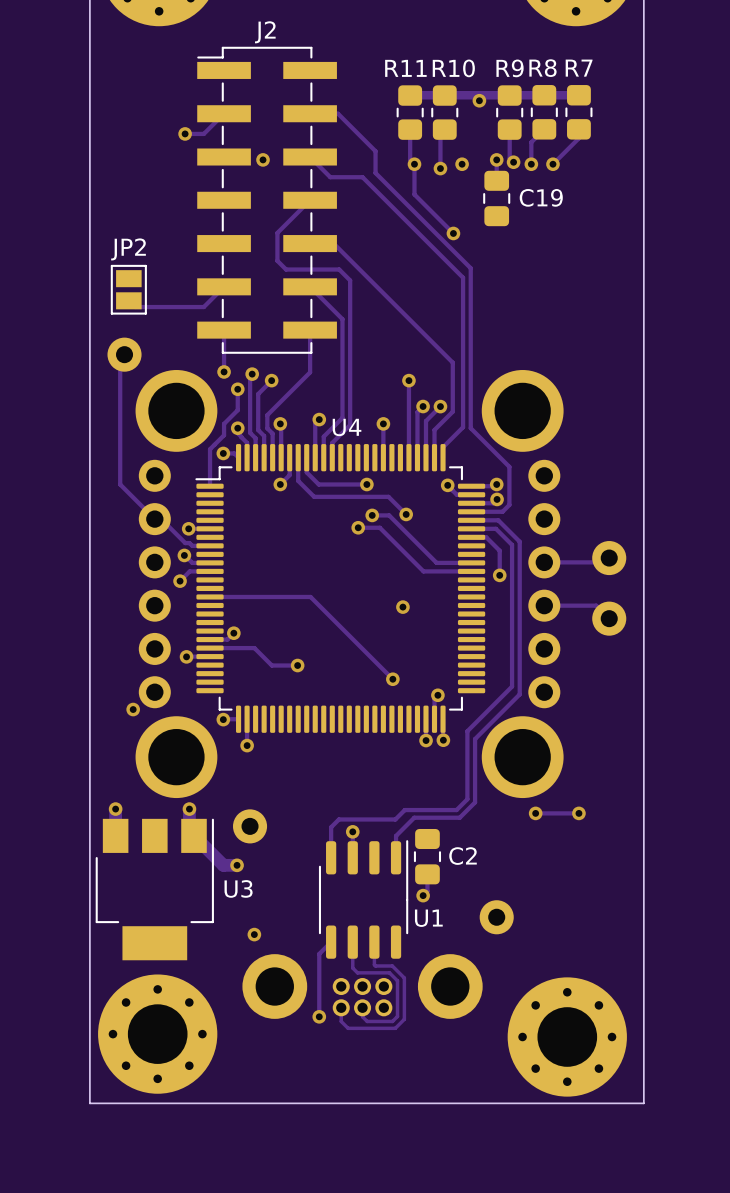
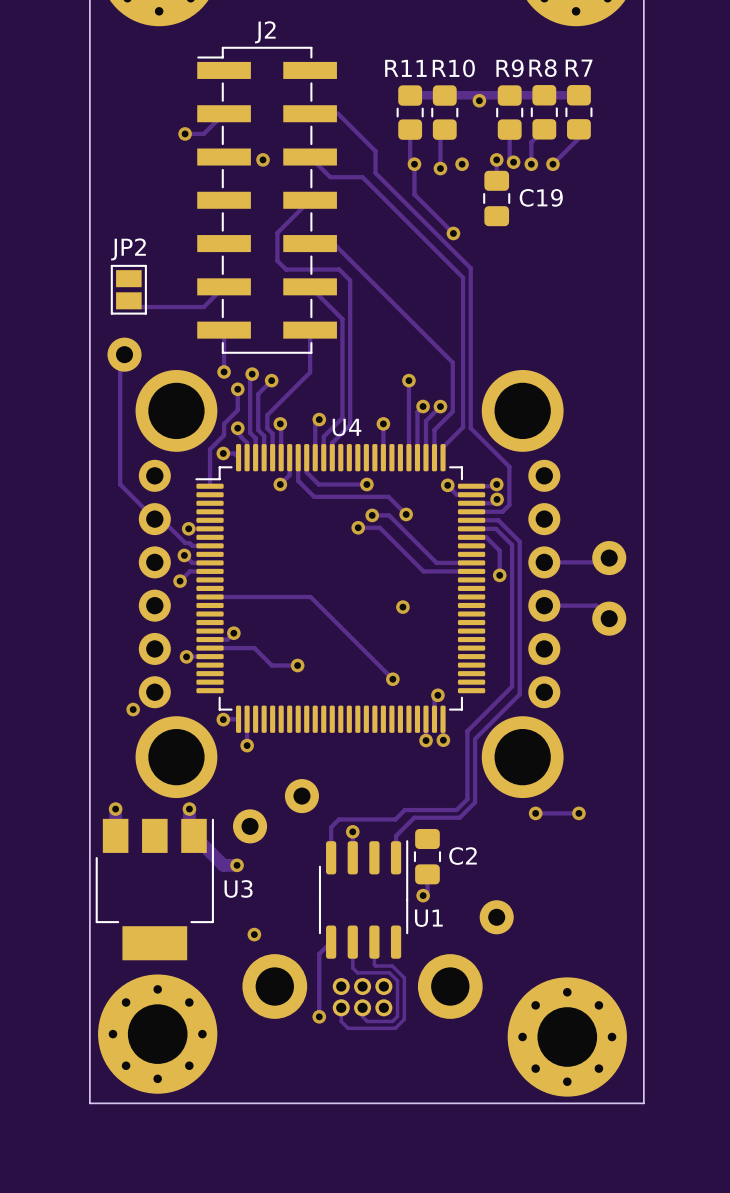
part: none -> (301, 796)

